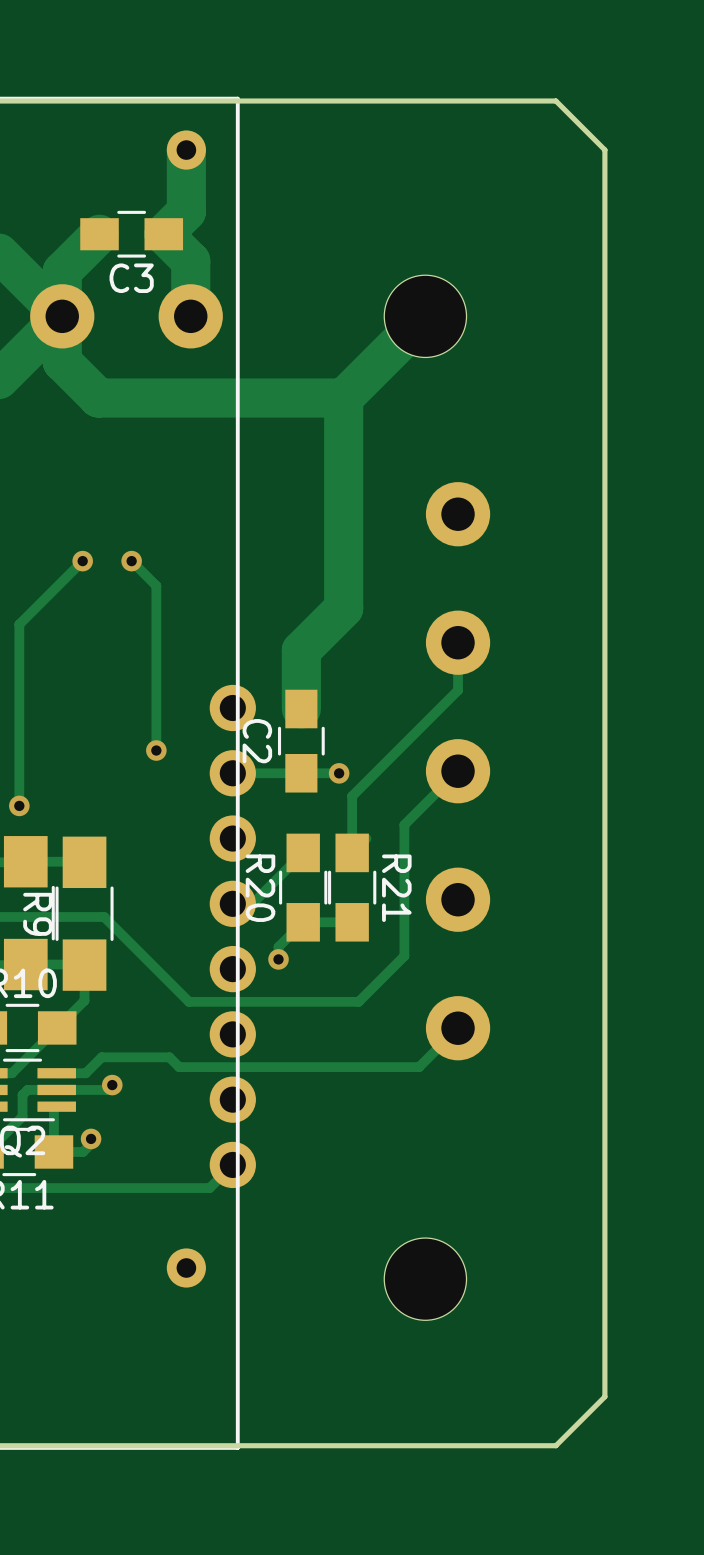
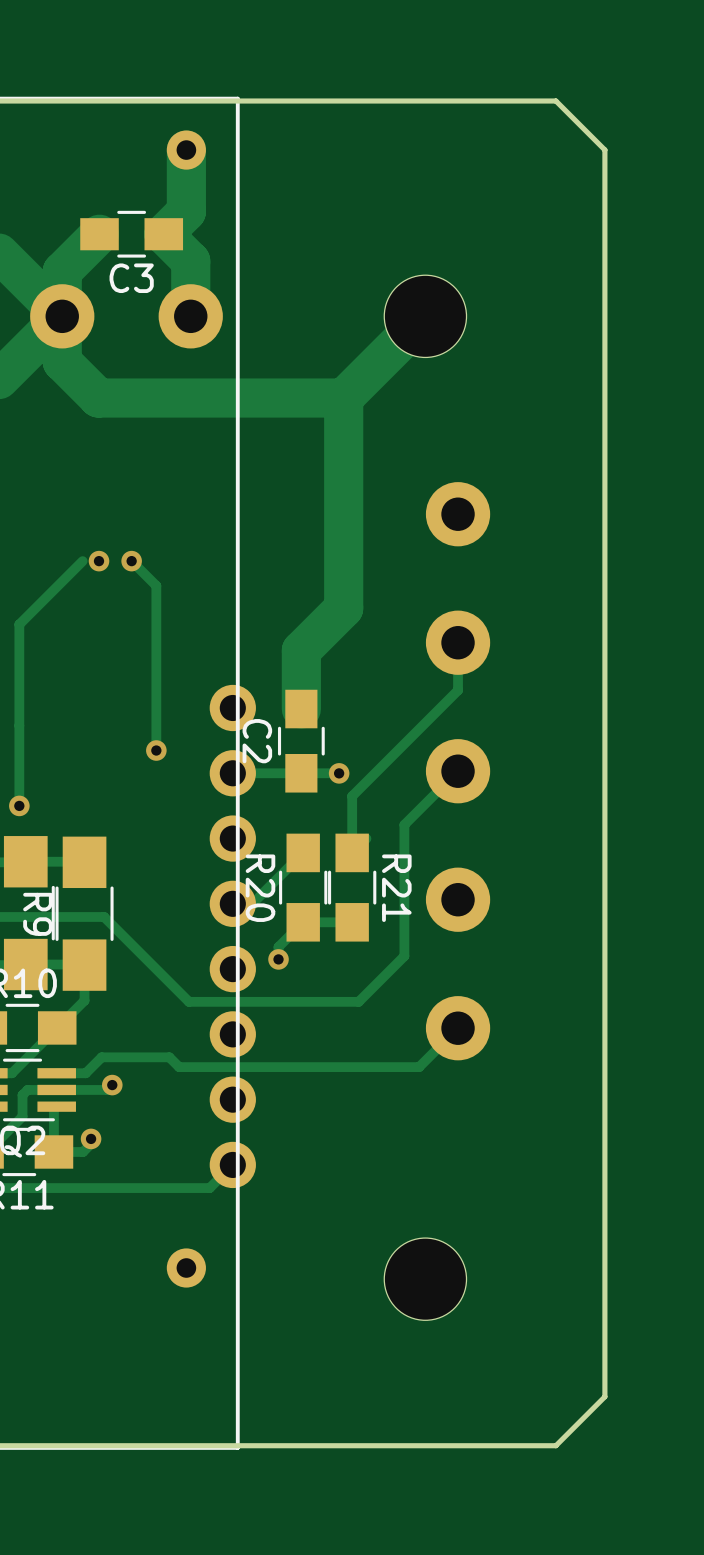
via position: (82, 561) -> (99, 561)

